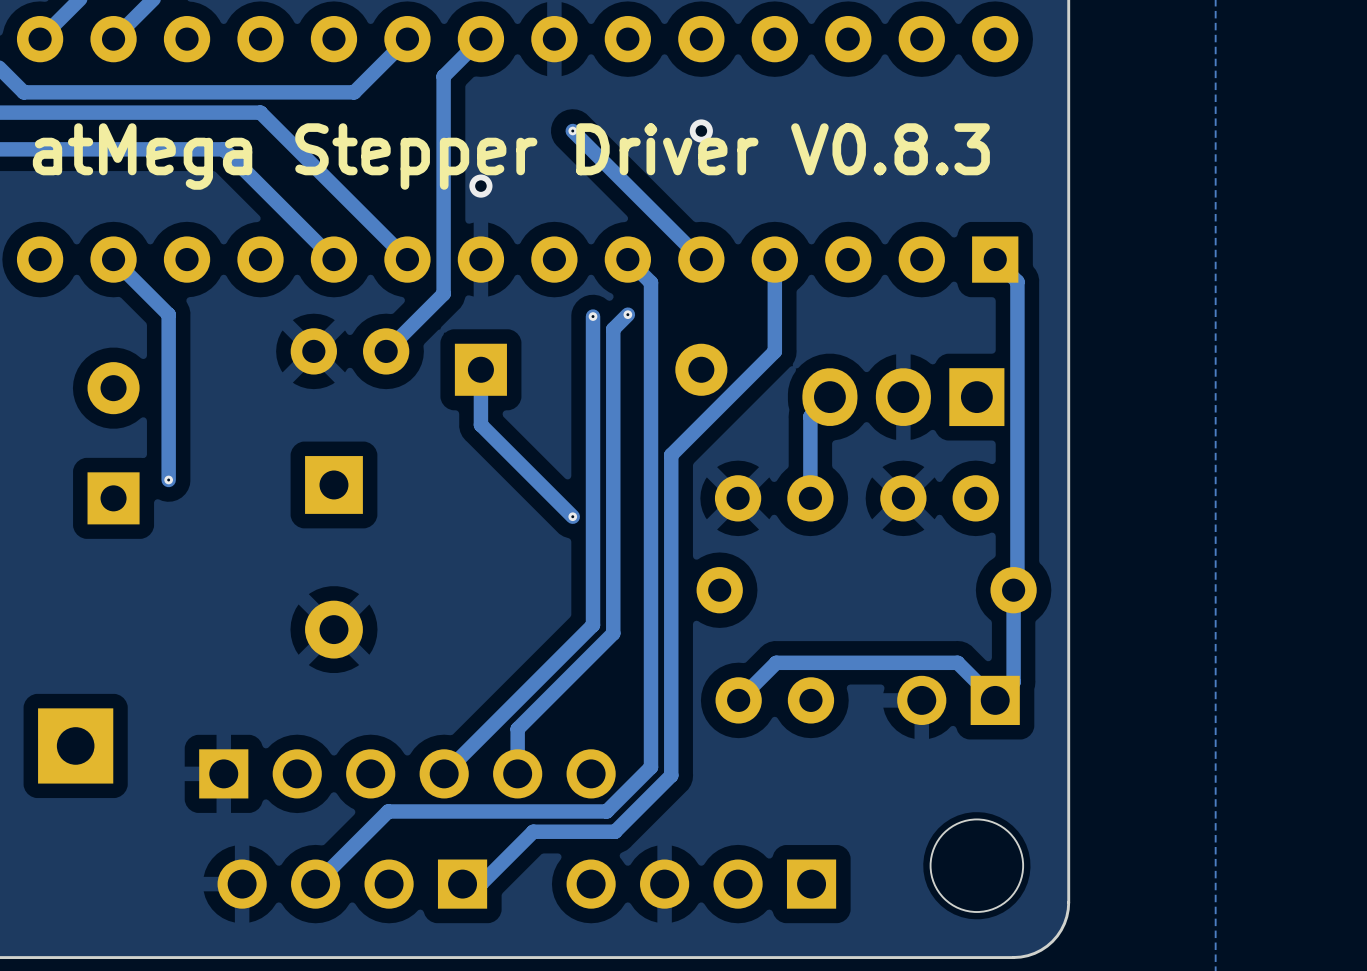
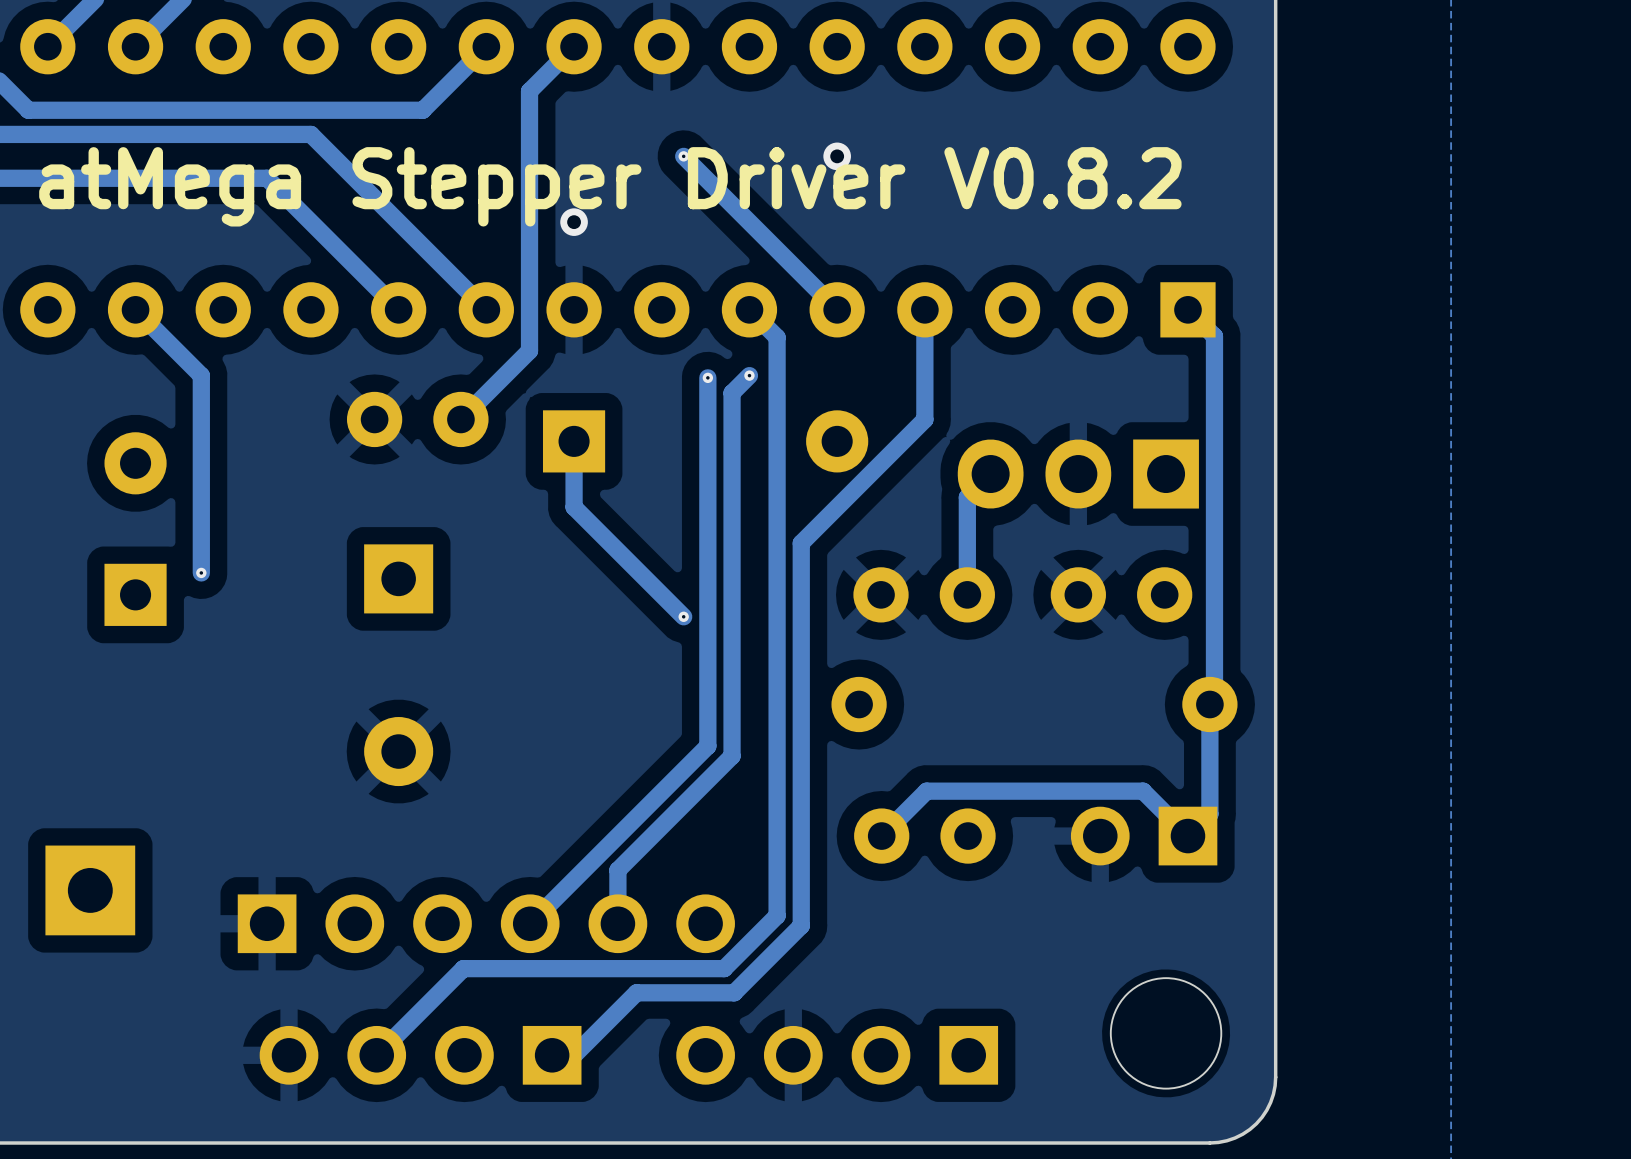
text: atMega Stepper Driver V0.8.3 (511, 156) -> atMega Stepper Driver V0.8.2 (610, 186)

